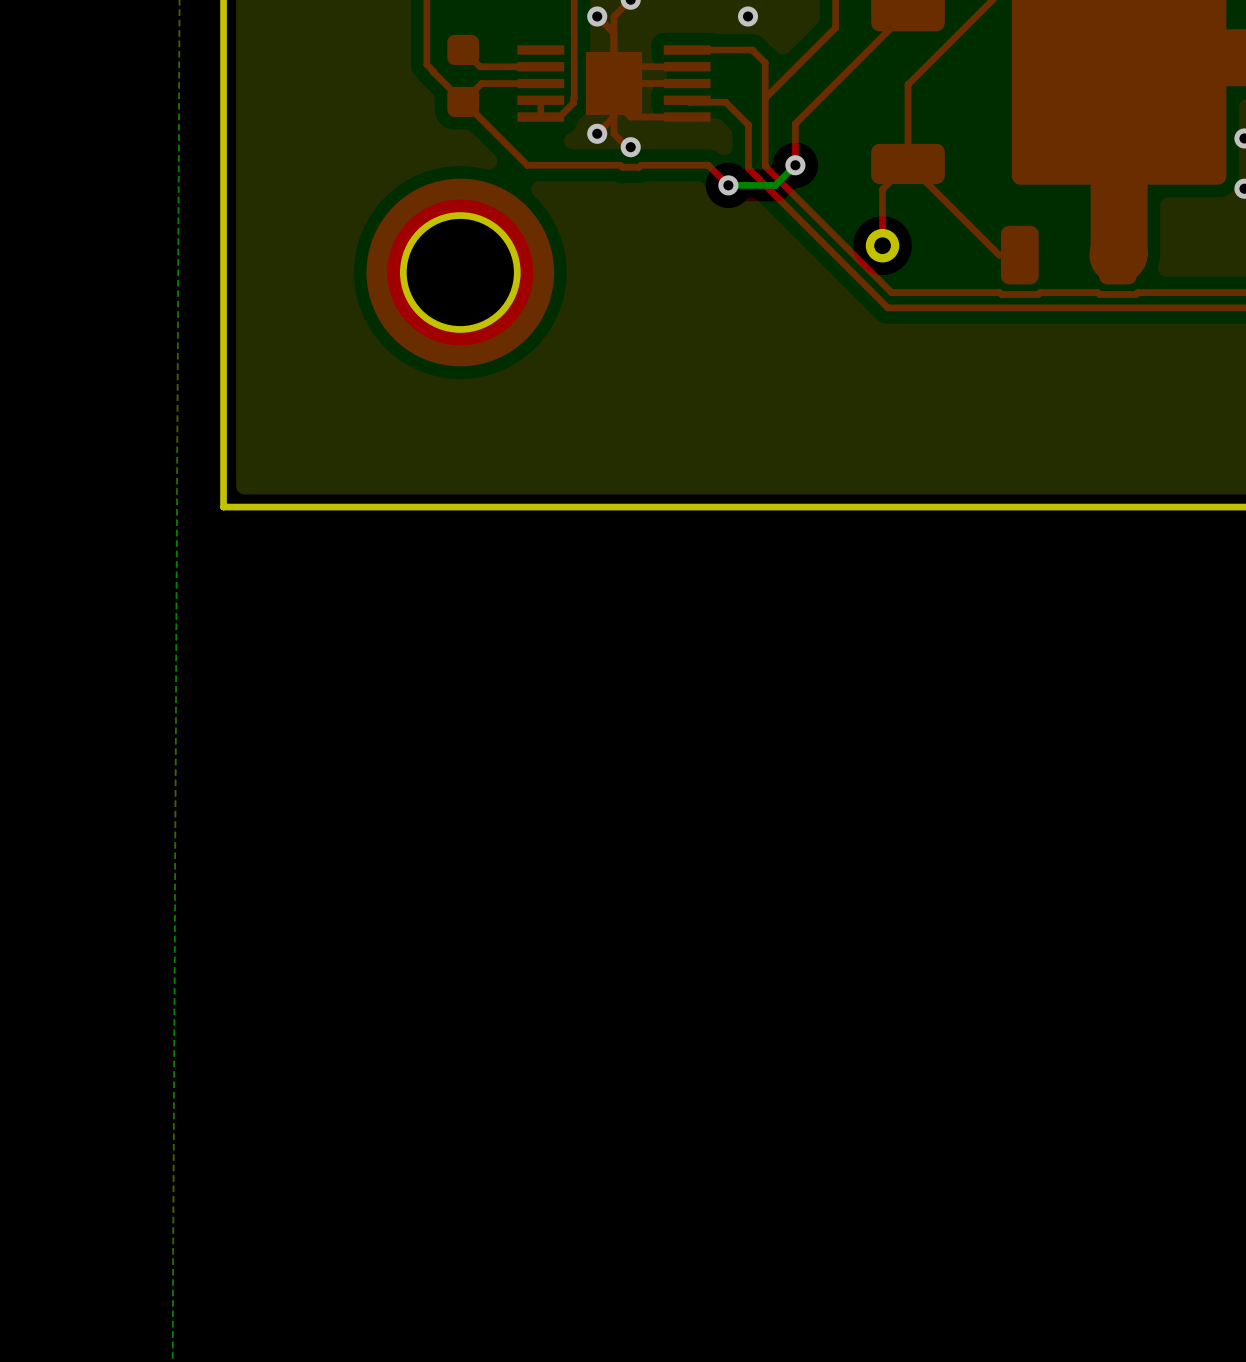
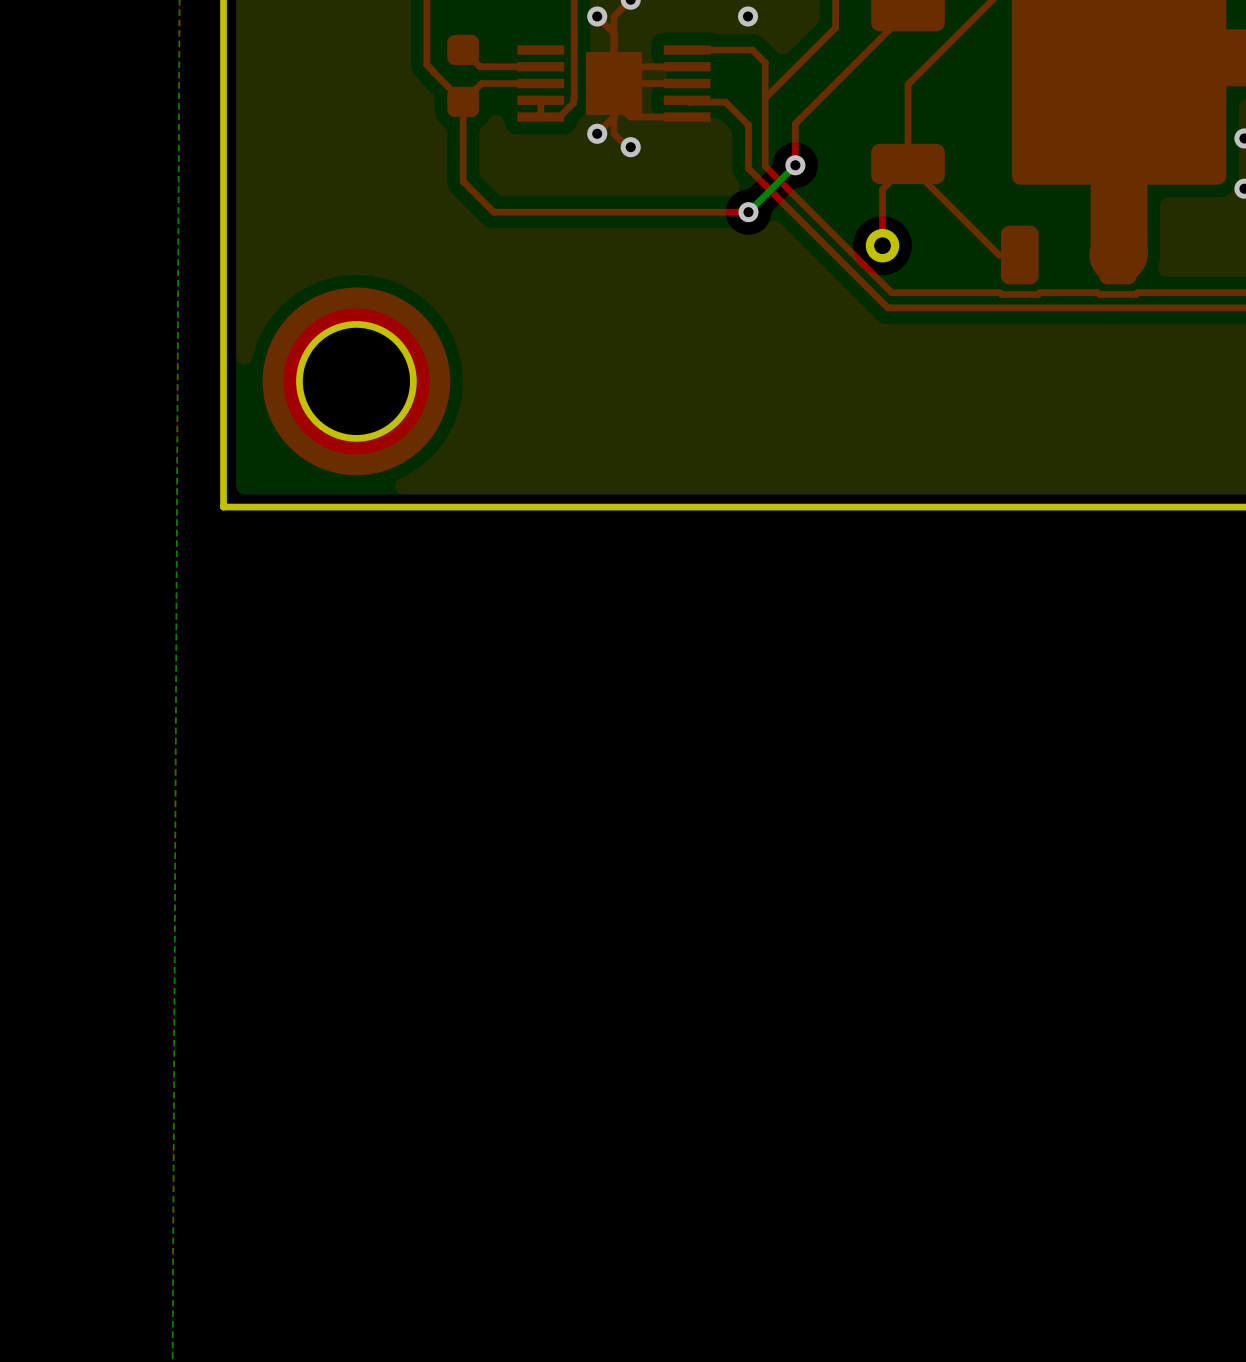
top track: (463, 101) (527, 165) (620, 165) (622, 167) (639, 167) (641, 165) (708, 165) (728, 185) -> (463, 101) (463, 181) (493, 212) (748, 212)
via position: (728, 185) -> (748, 212)
bottom track: (775, 185) (728, 185) -> (775, 185) (748, 212)
part position: (460, 272) -> (356, 381)

